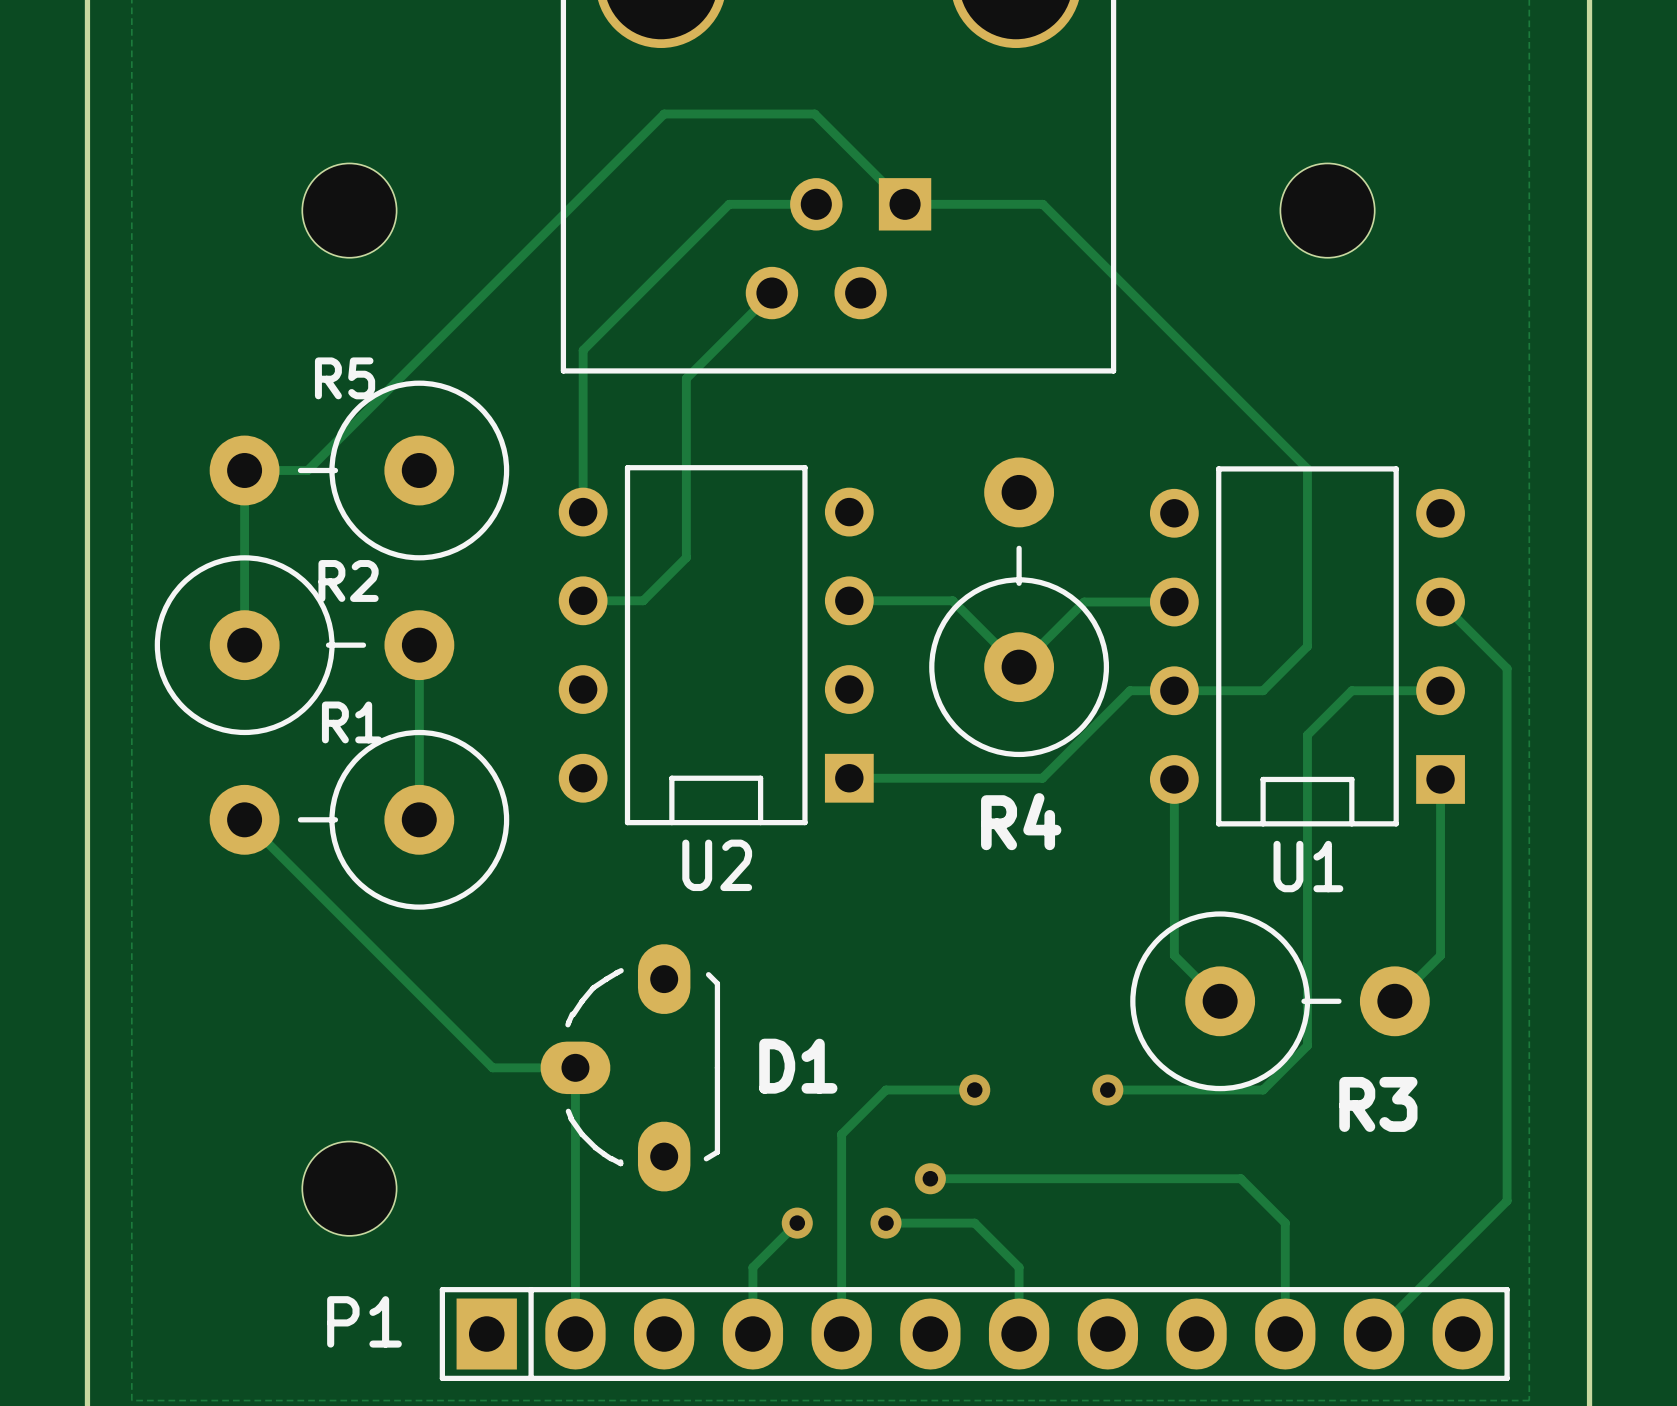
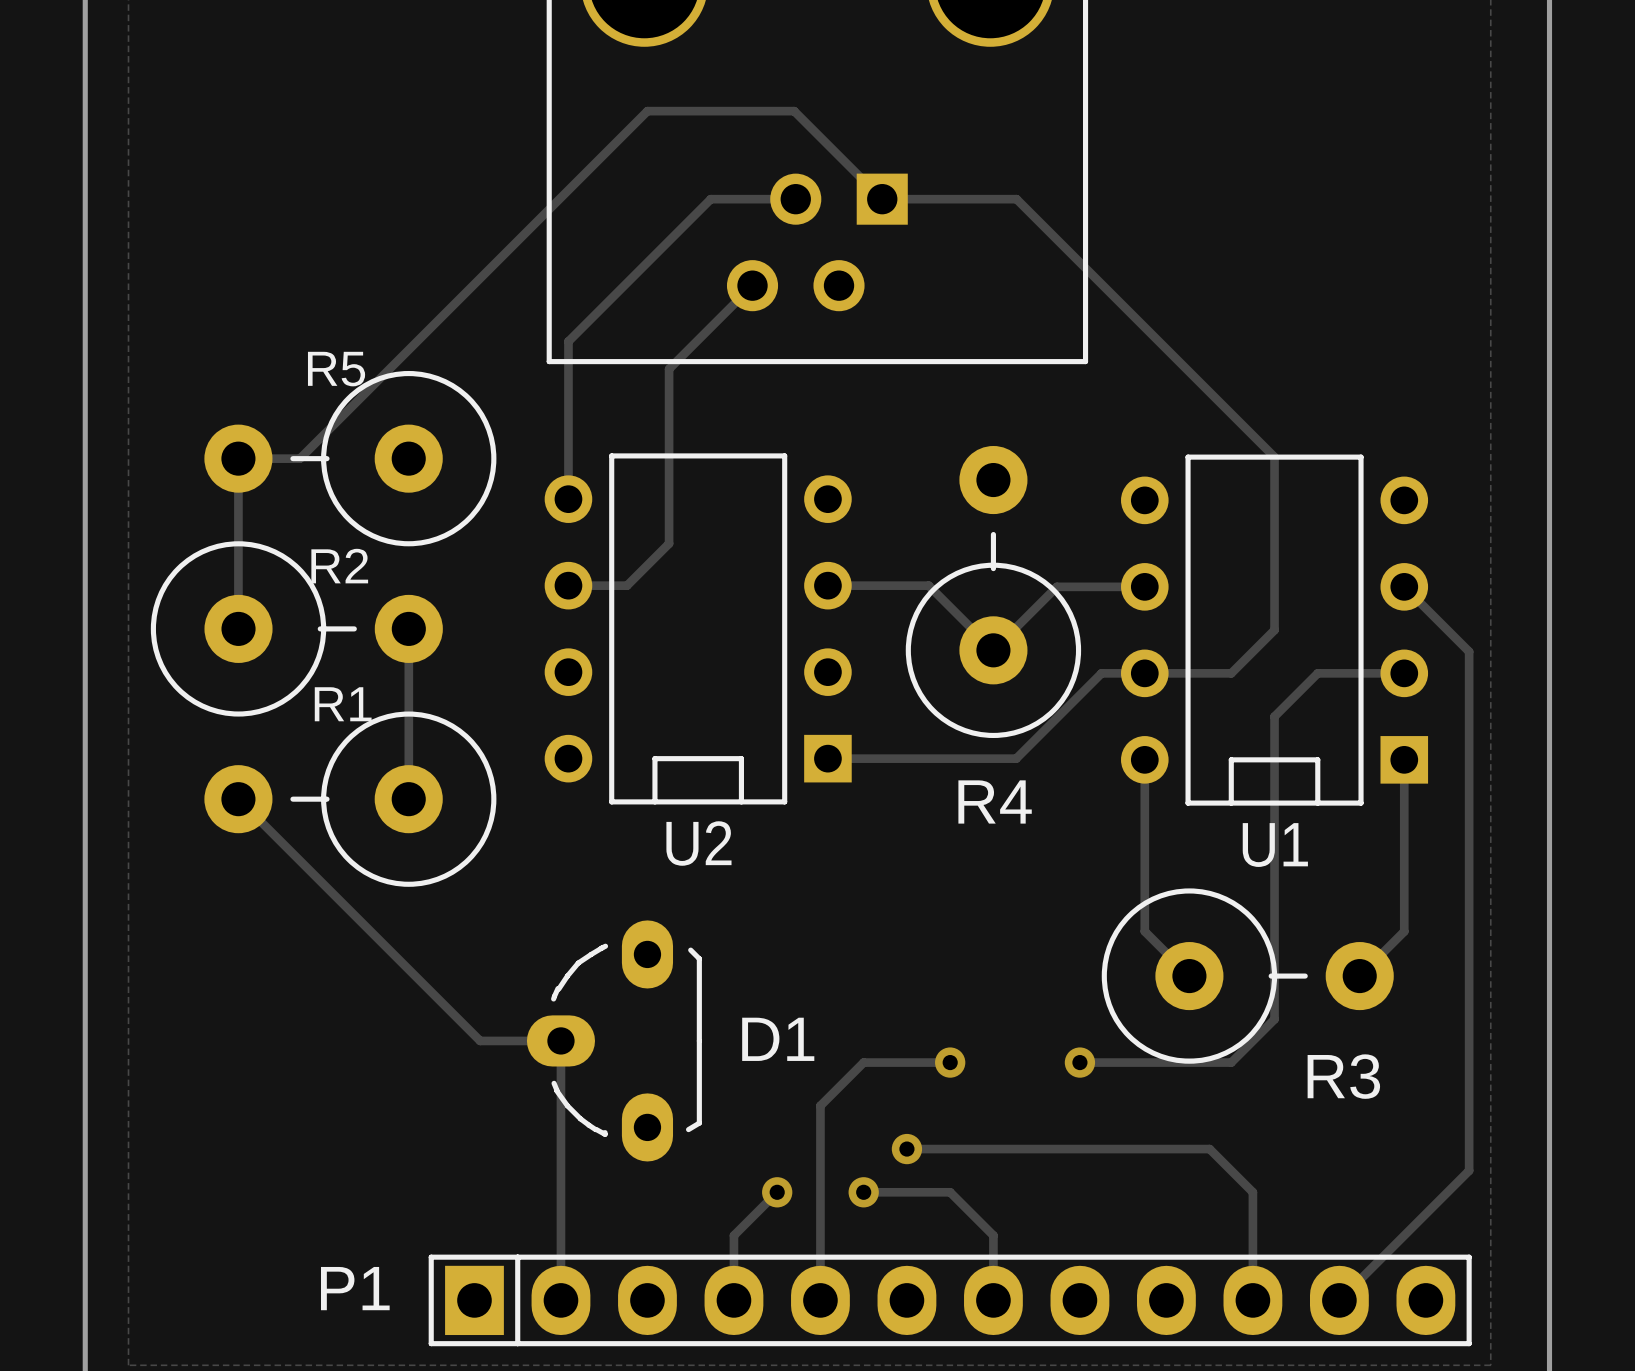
part: (349, 210) -> none
part: (1327, 210) -> none
part: (349, 1188) -> none

